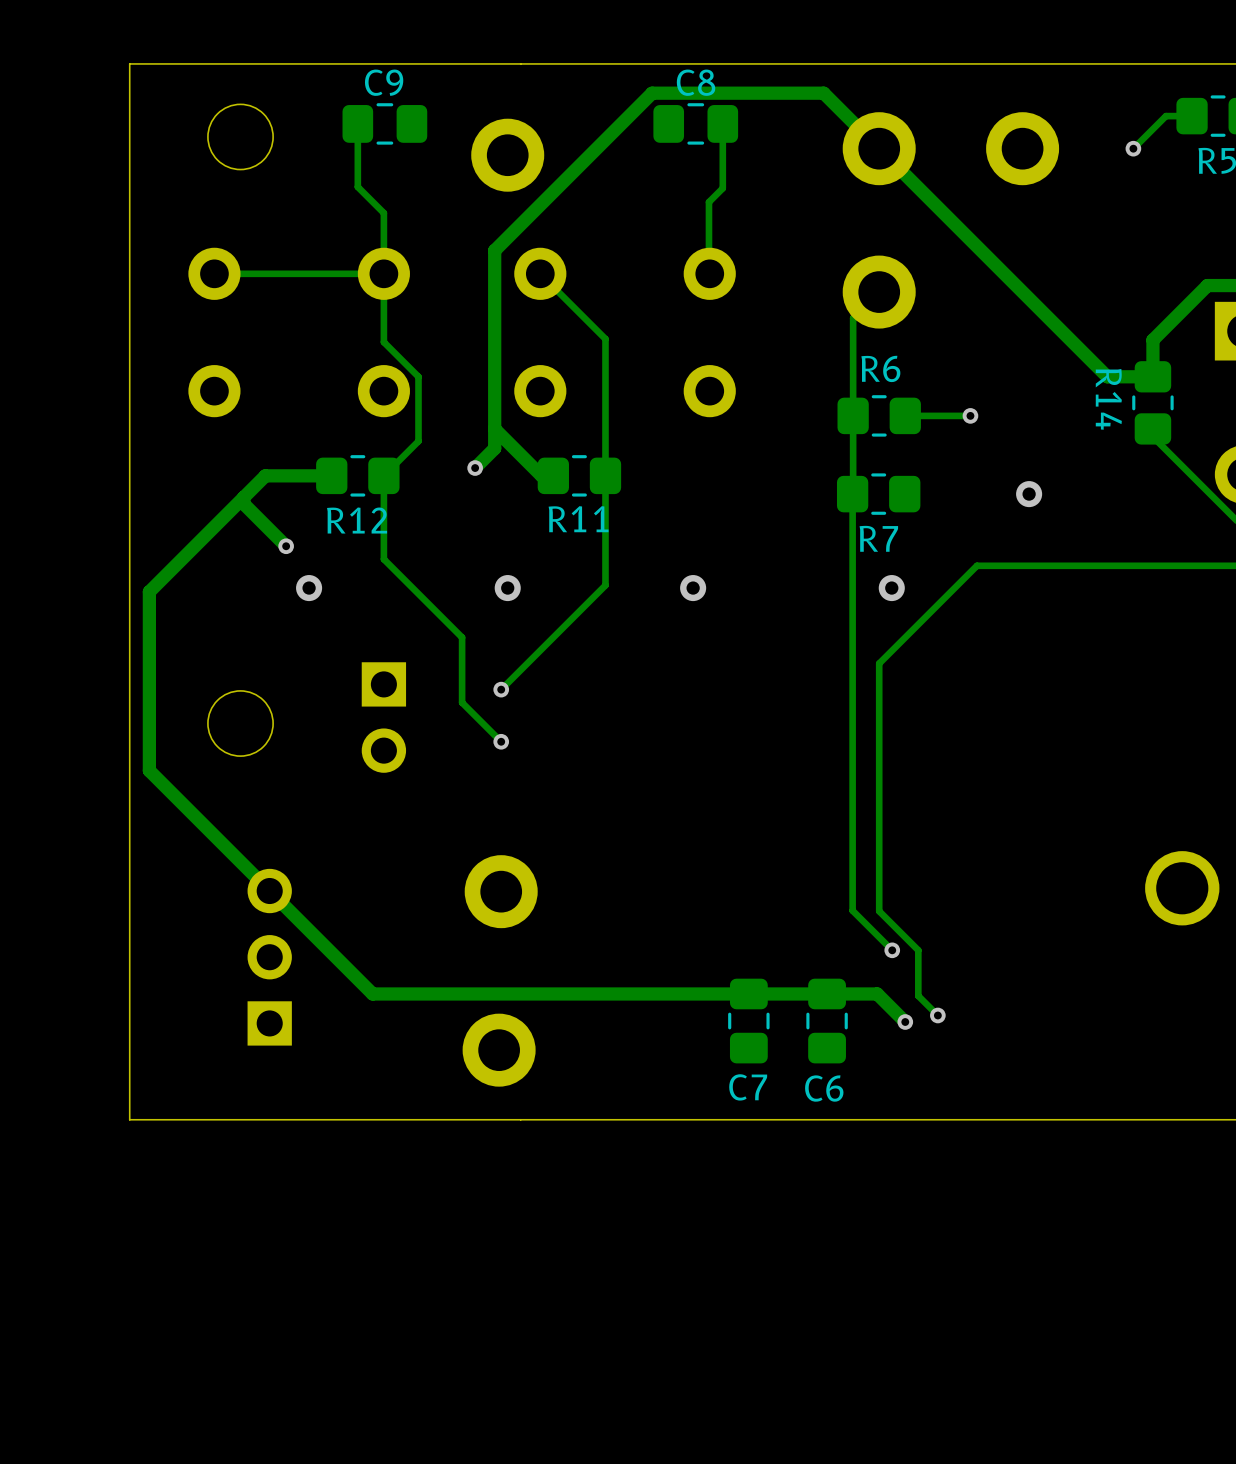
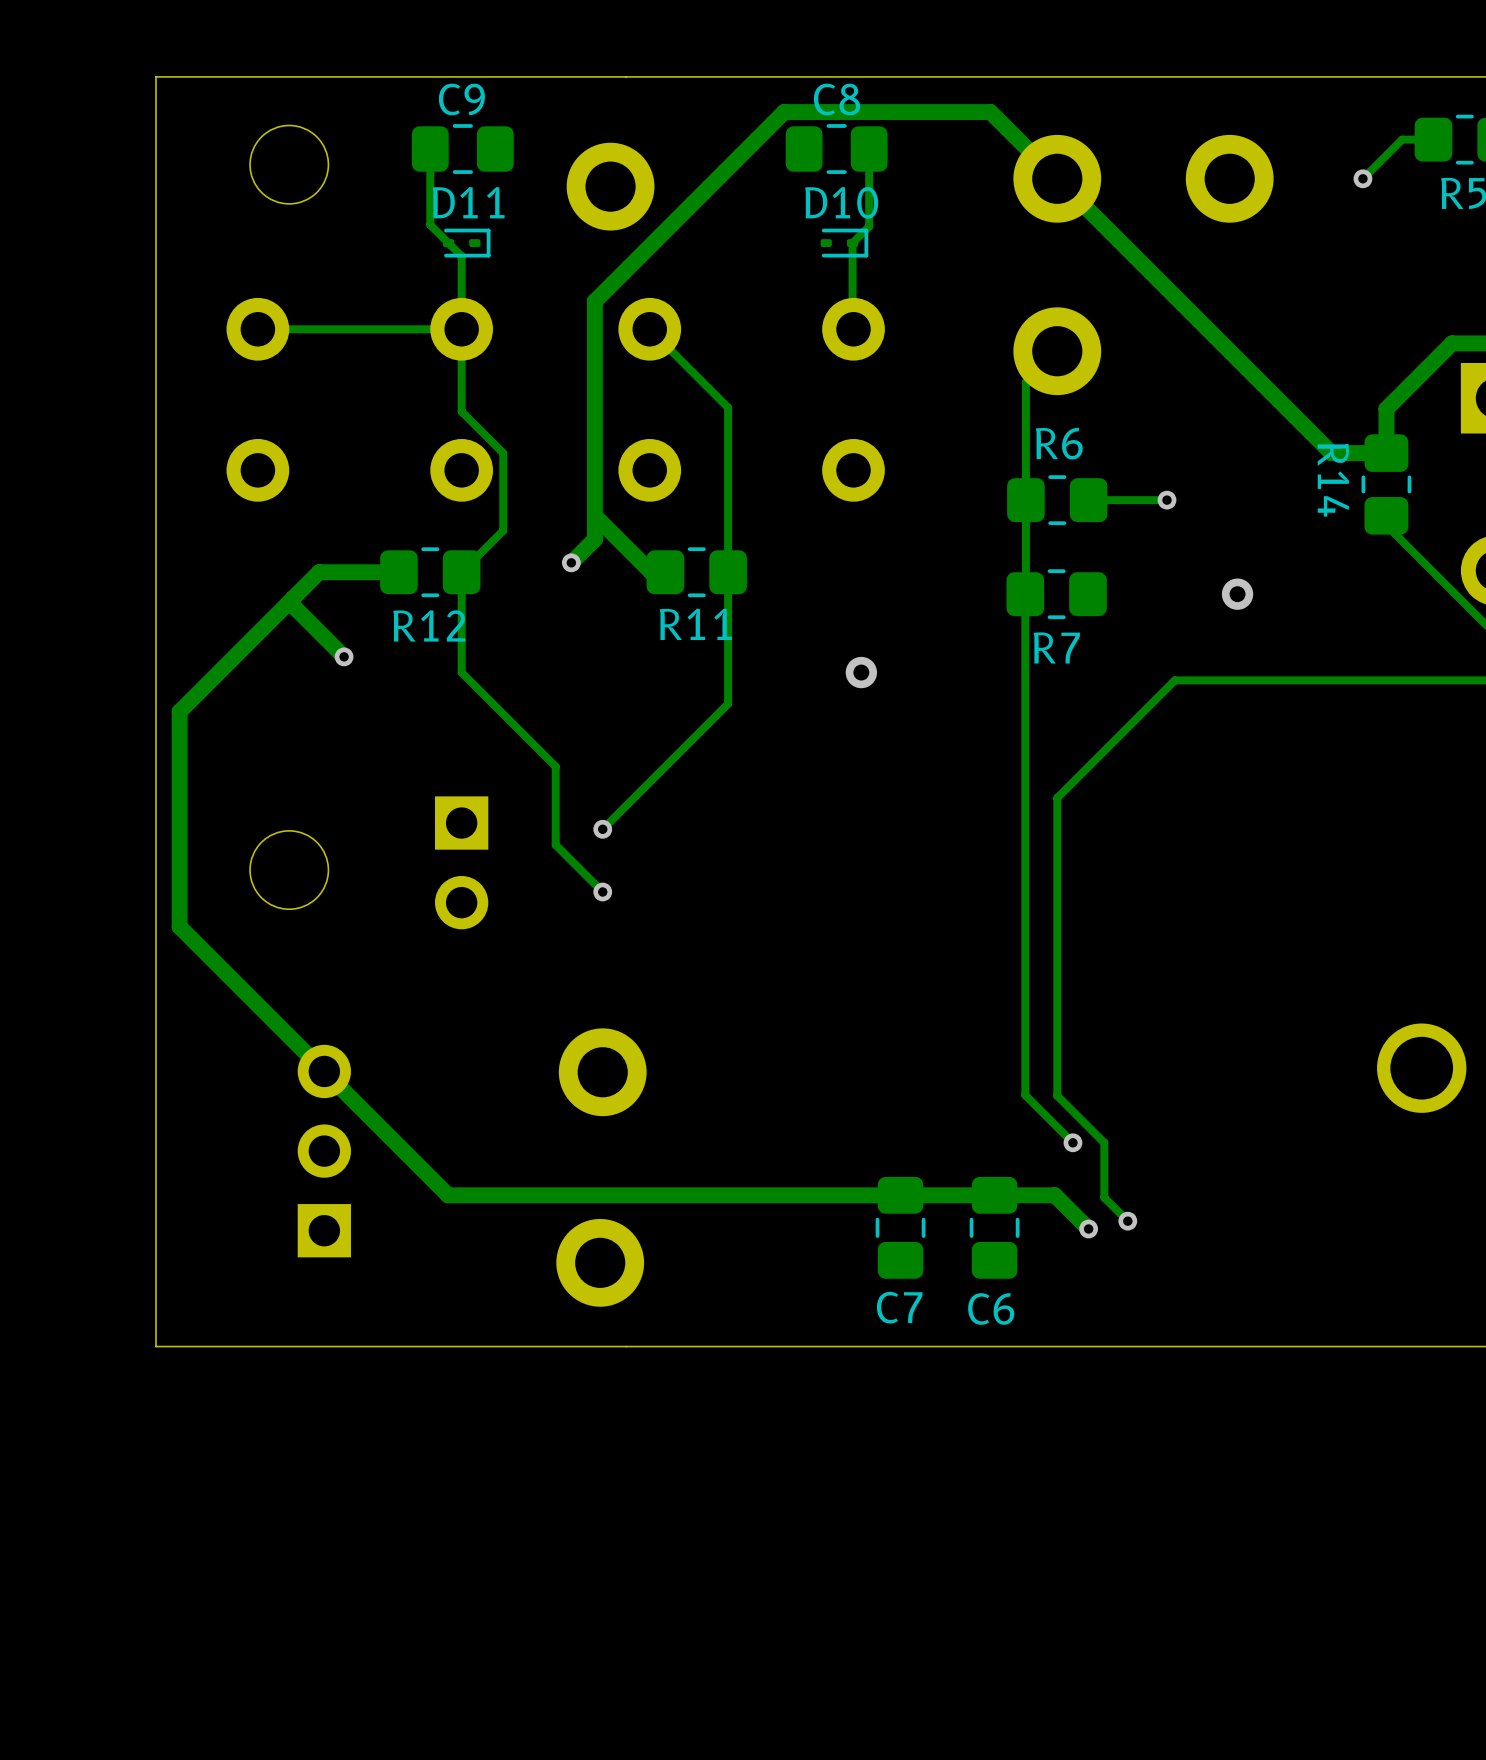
D11: none -> (466, 243)
D10: none -> (844, 243)
via: (309, 588) -> none
via: (507, 588) -> none
via position: (693, 588) -> (861, 672)
via: (891, 588) -> none

